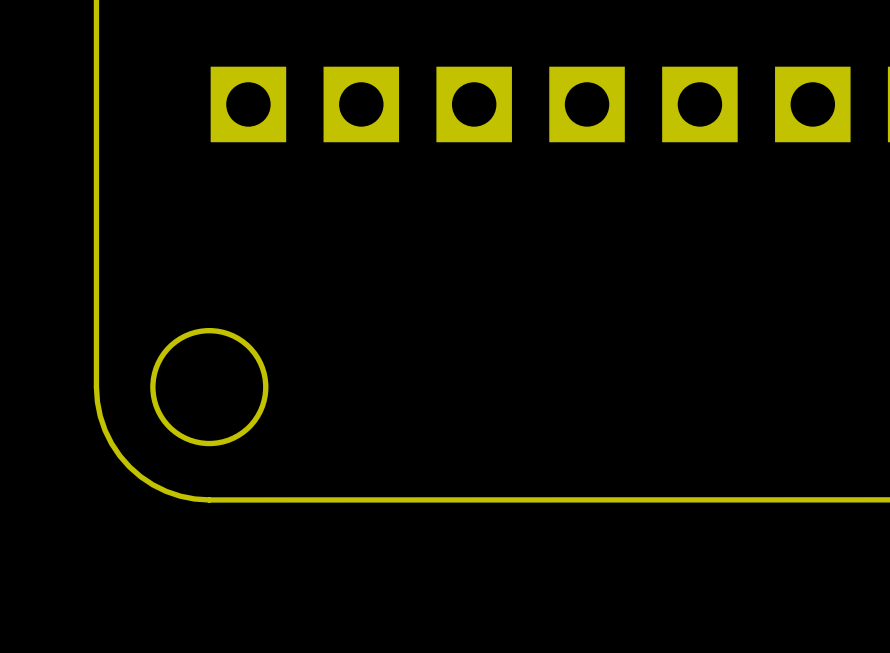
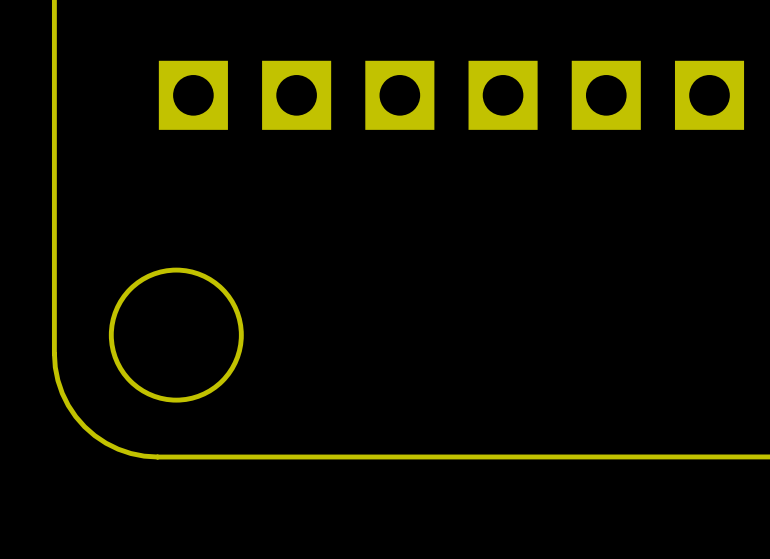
round board edge size: [150, 327, 269, 447] -> [108, 267, 244, 403]

